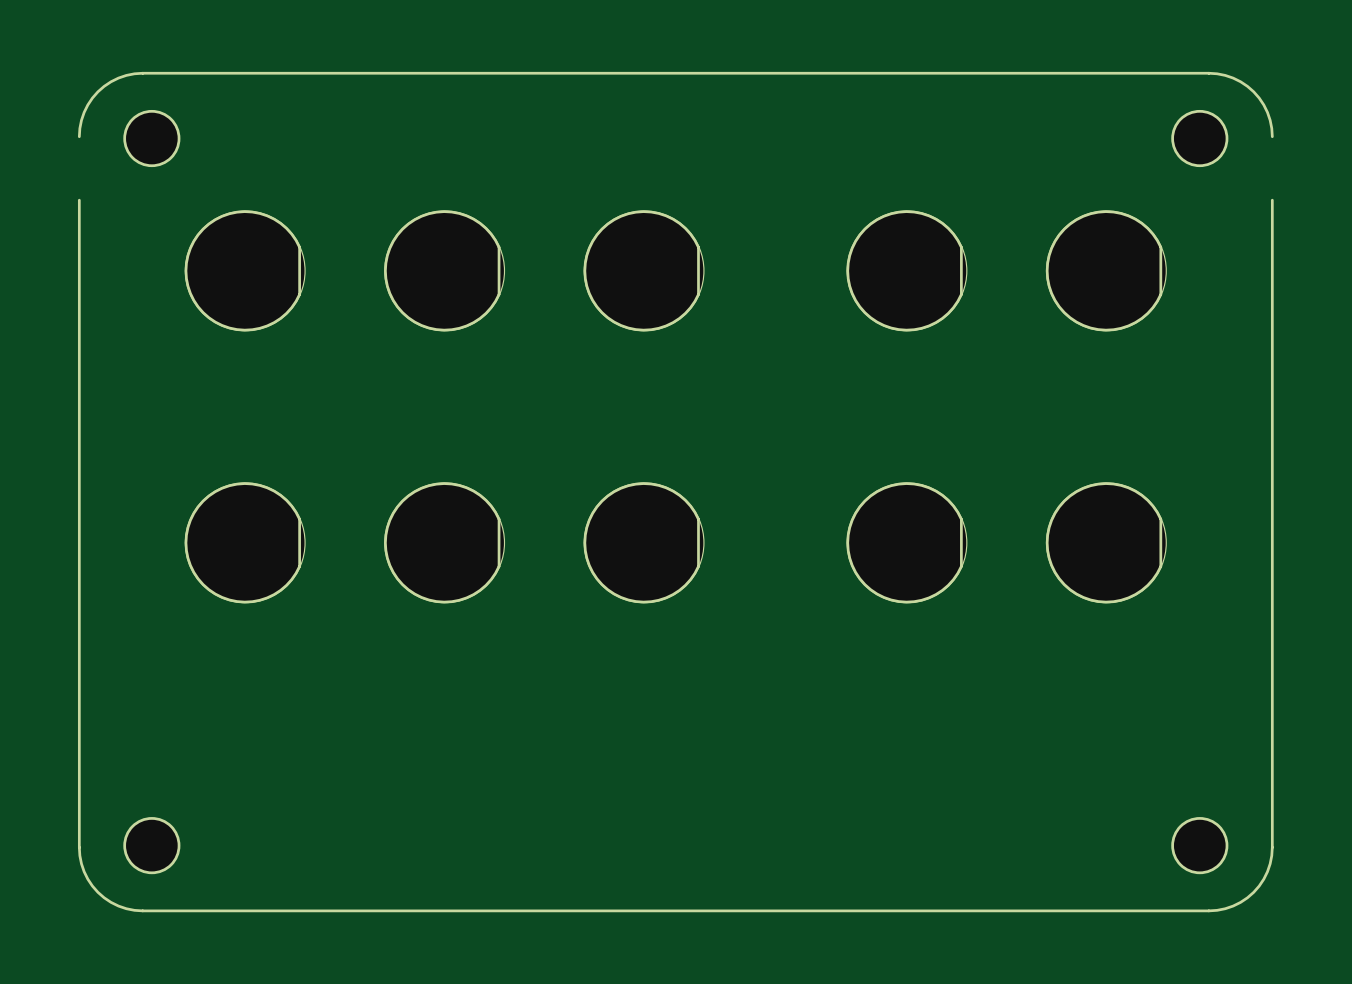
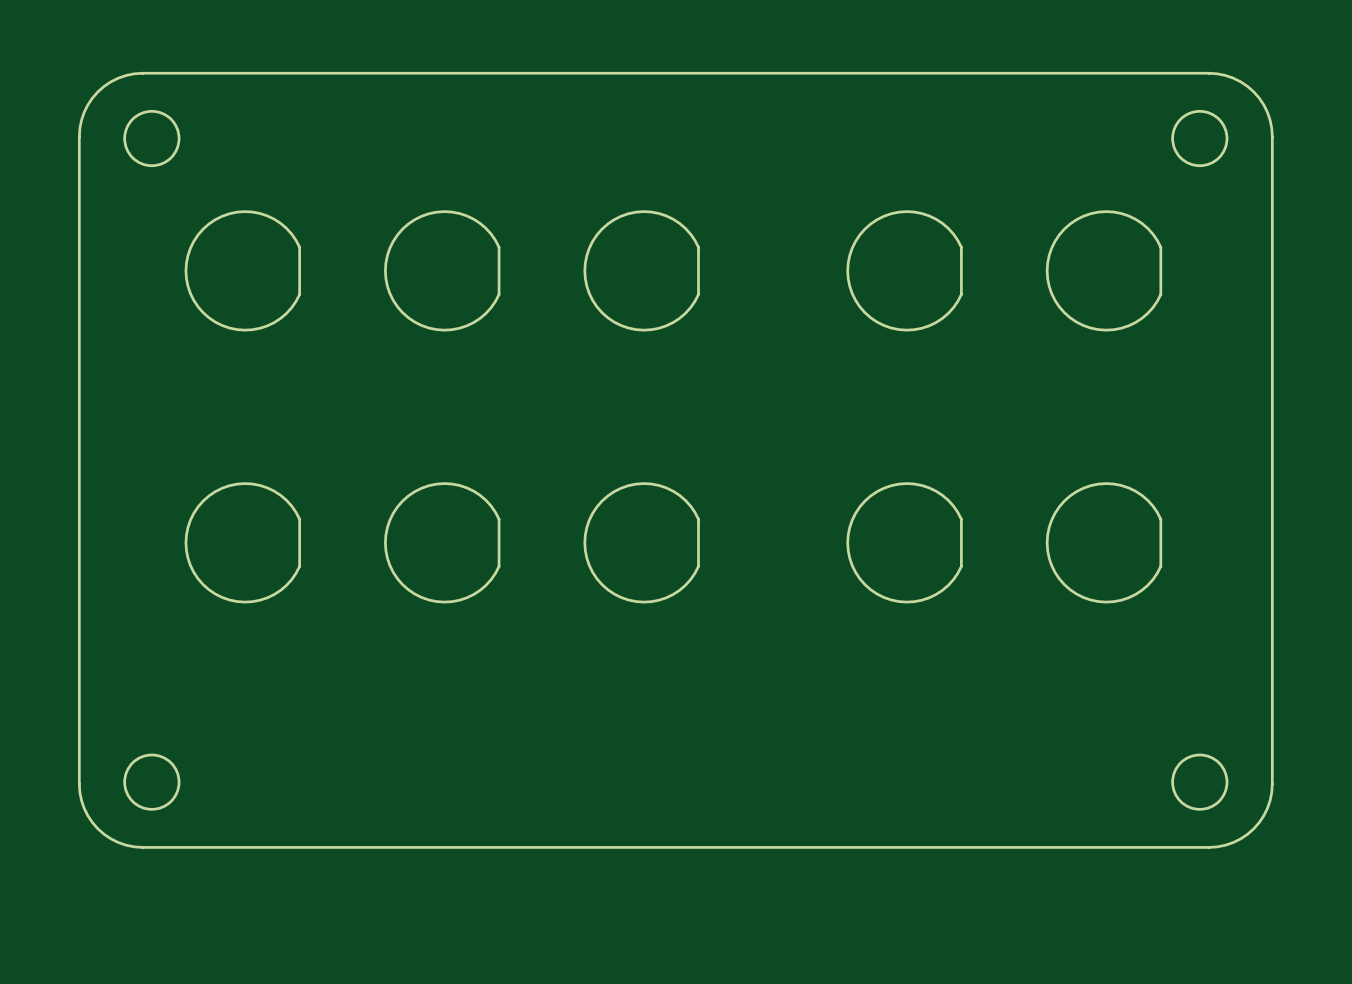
board edge: none -> (79, 136) (79, 200)
board edge: none -> (1272, 136) (1272, 200)
part: (151, 138) -> none
part: (1199, 138) -> none
part: (245, 270) -> none
part: (444, 270) -> none
part: (644, 270) -> none
part: (906, 270) -> none
part: (1106, 270) -> none
part: (245, 542) -> none
part: (444, 542) -> none
part: (644, 542) -> none
part: (906, 542) -> none
part: (1106, 542) -> none
board edge: (1272, 783) (1271, 855) (1263, 879) (1253, 892) (1240, 902) (1225, 908) (1208, 910) (134, 910) (118, 906) (104, 897) (92, 886) (84, 871) (79, 847) (79, 783) -> (1272, 783) (1267, 808) (1253, 828) (1233, 842) (1208, 847) (142, 847) (118, 842) (97, 828) (84, 808) (79, 783)
part: (151, 845) -> none
round board edge position: (151, 845) -> (151, 782)
part: (1199, 845) -> none
round board edge position: (1199, 845) -> (1199, 782)

